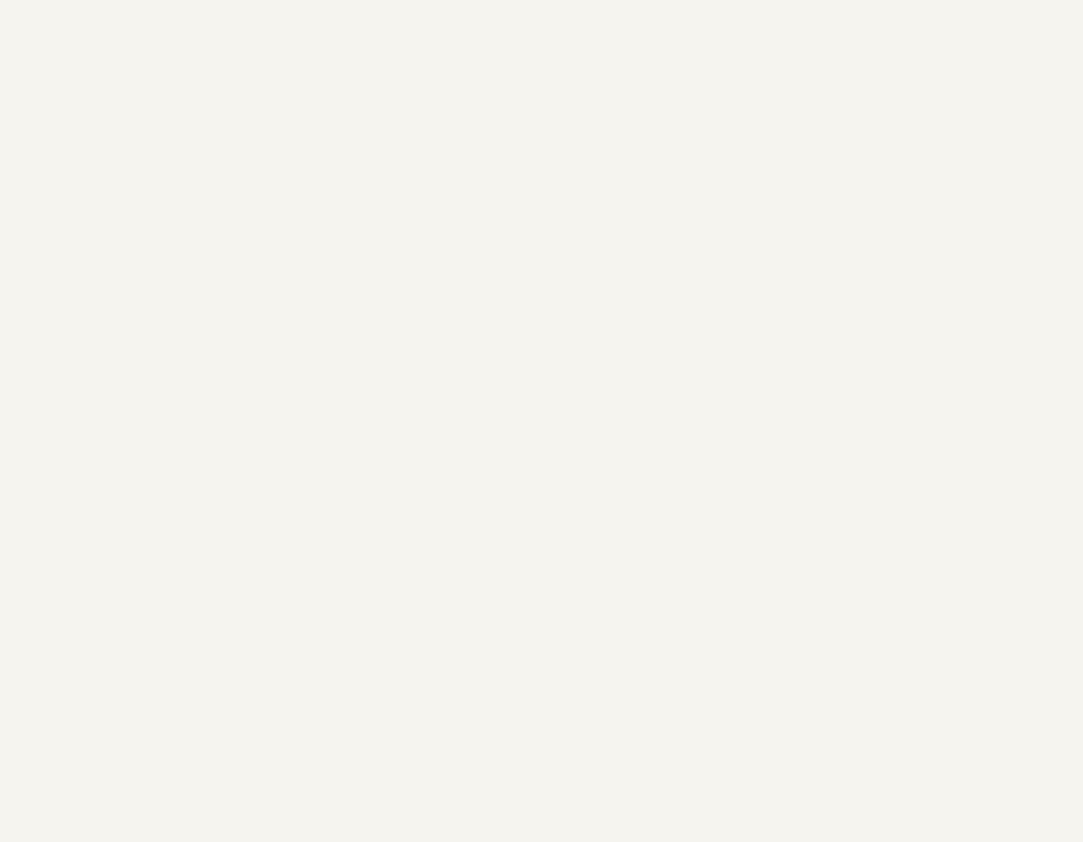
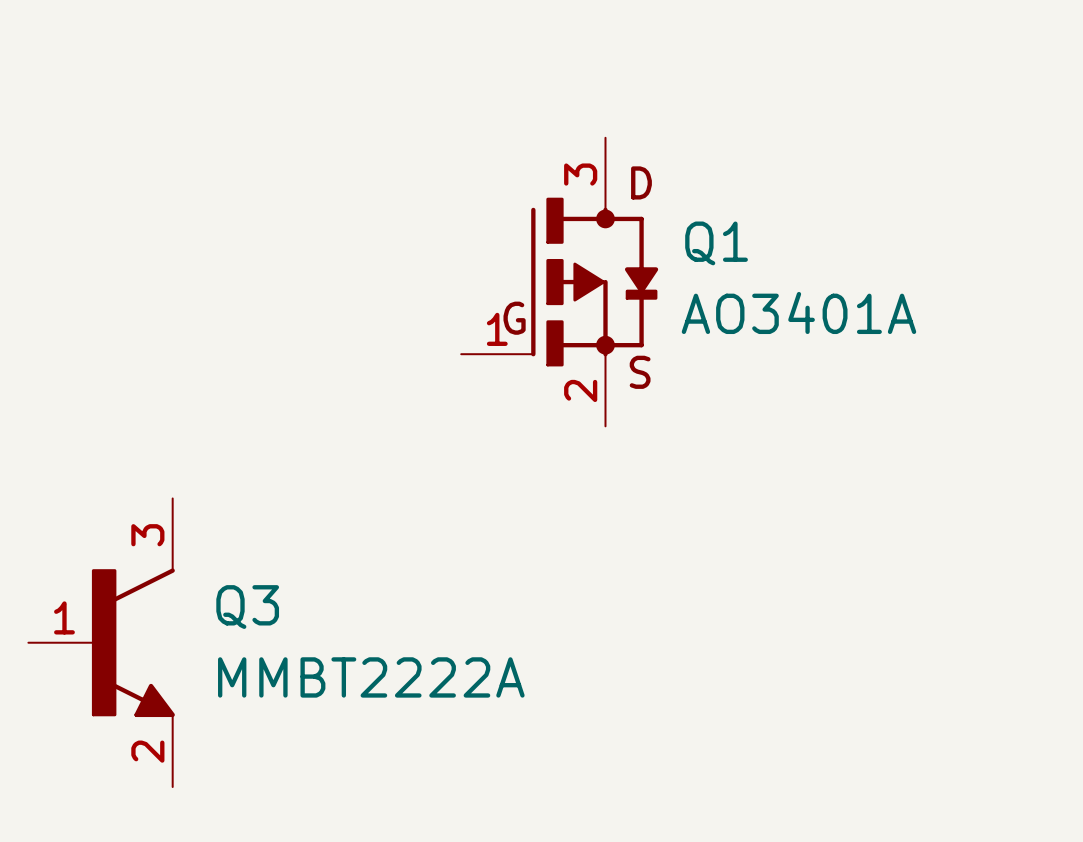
Q1: none -> AO3401A (559, 282)
Q3: none -> MMBT2222A (101, 642)

